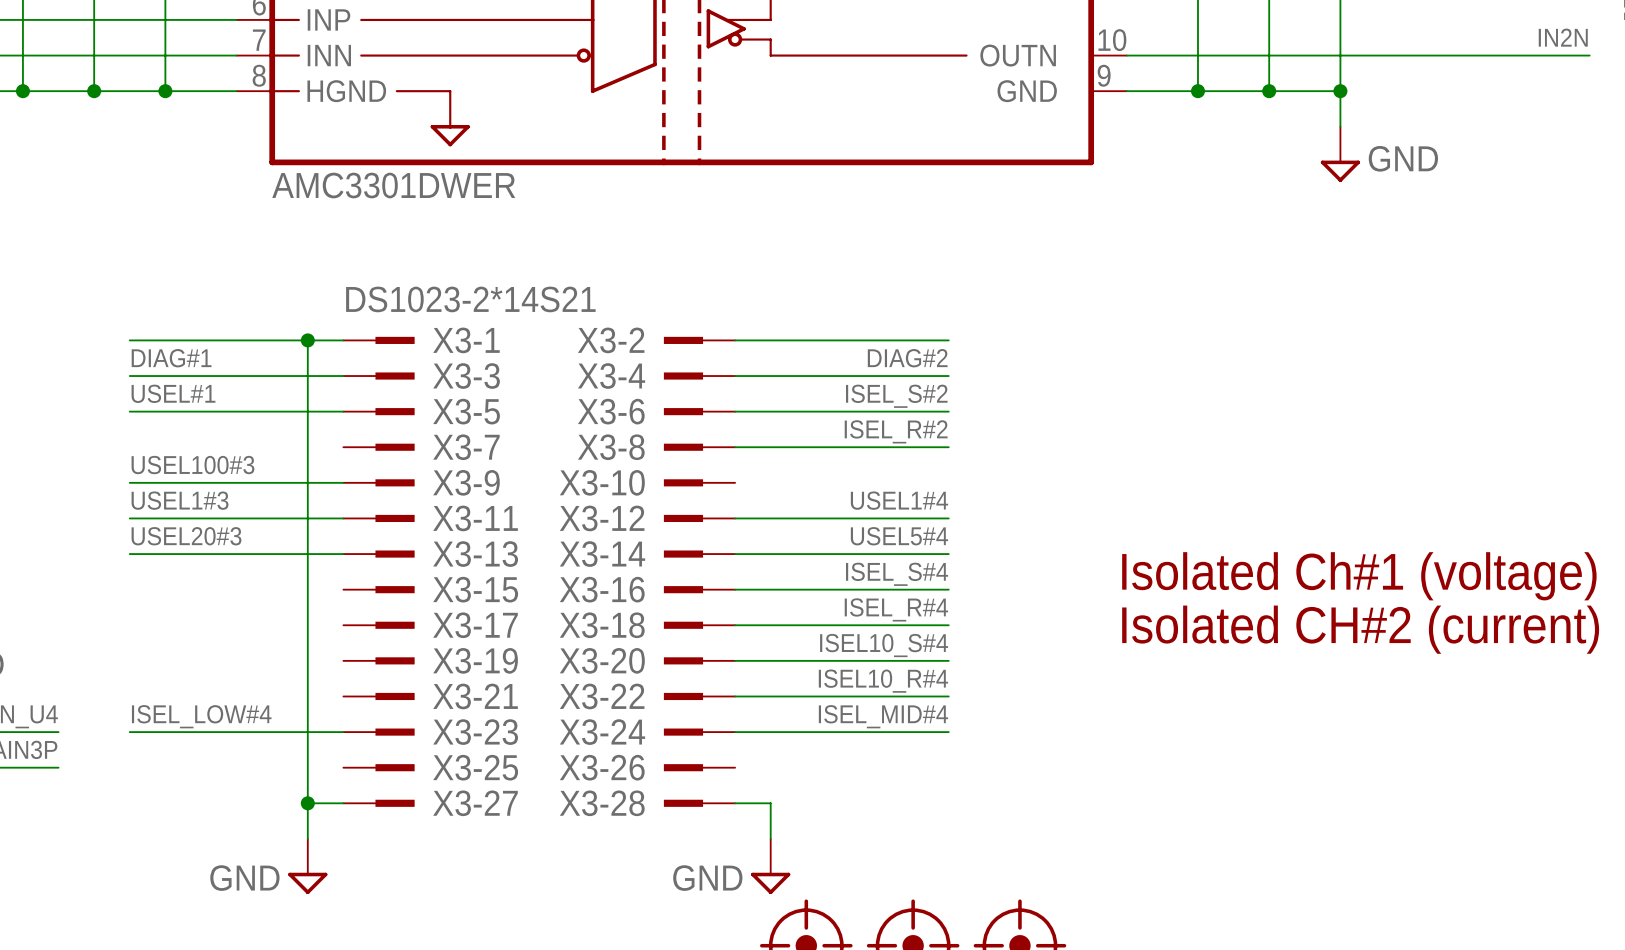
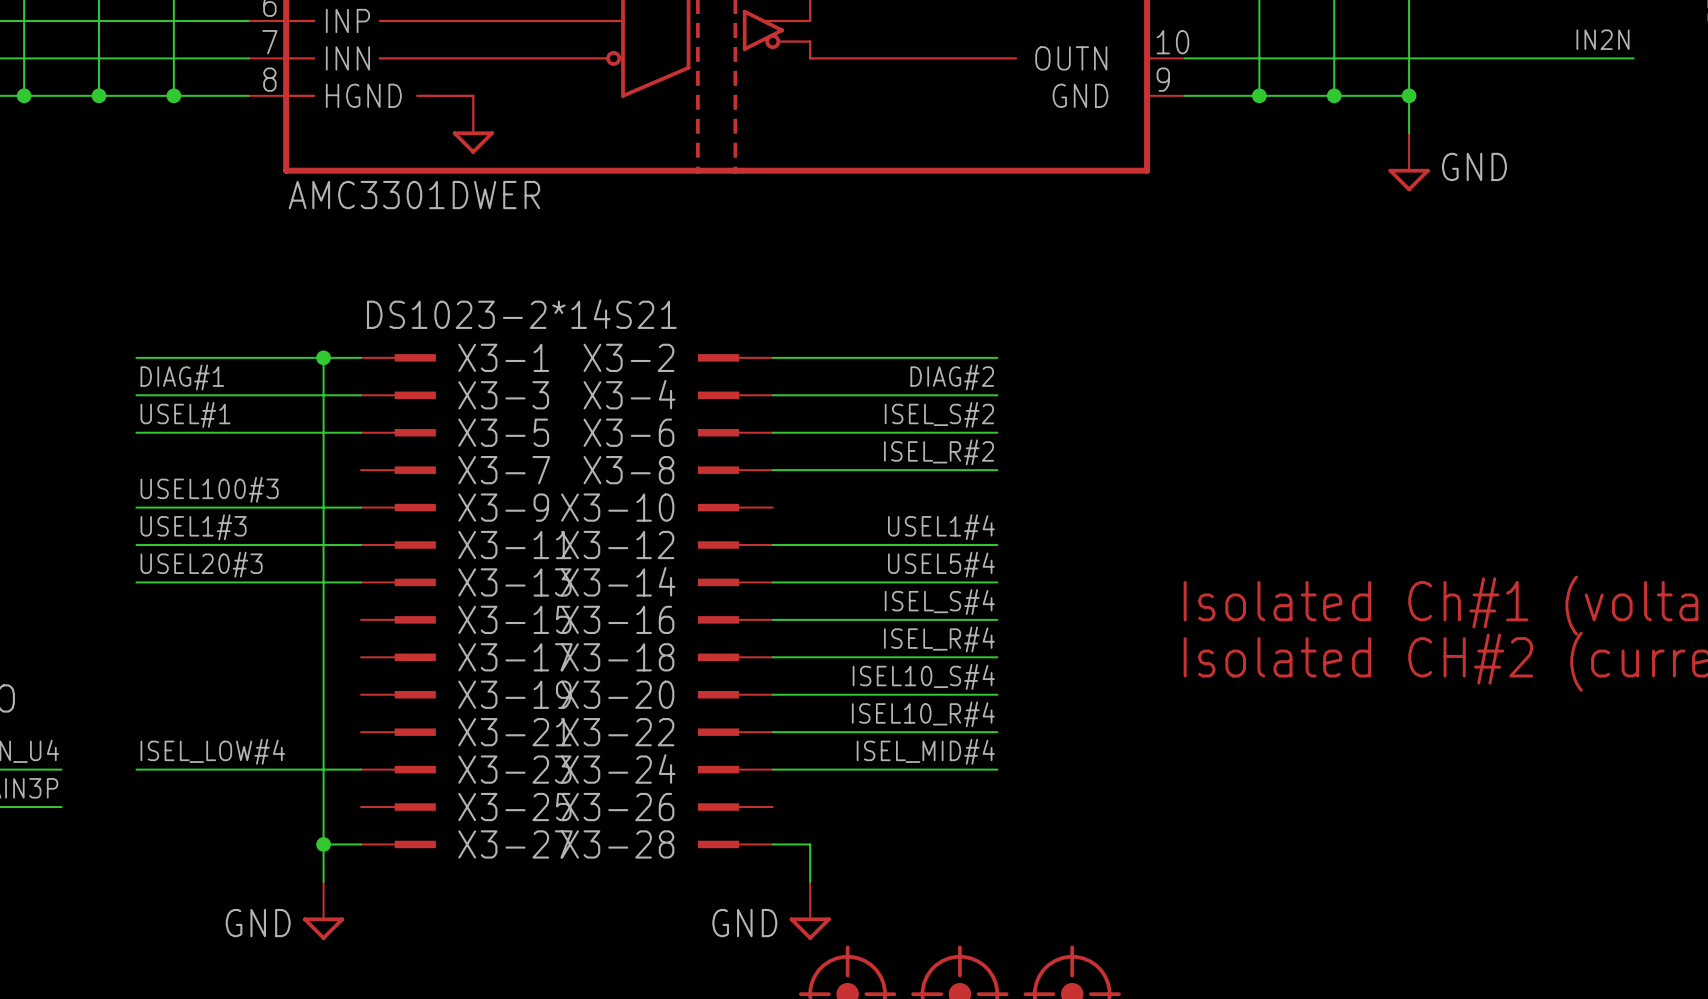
label position: IN2N (1563, 37) -> IN2N (1603, 39)
wire: (1554, 55) (1589, 55) -> none

